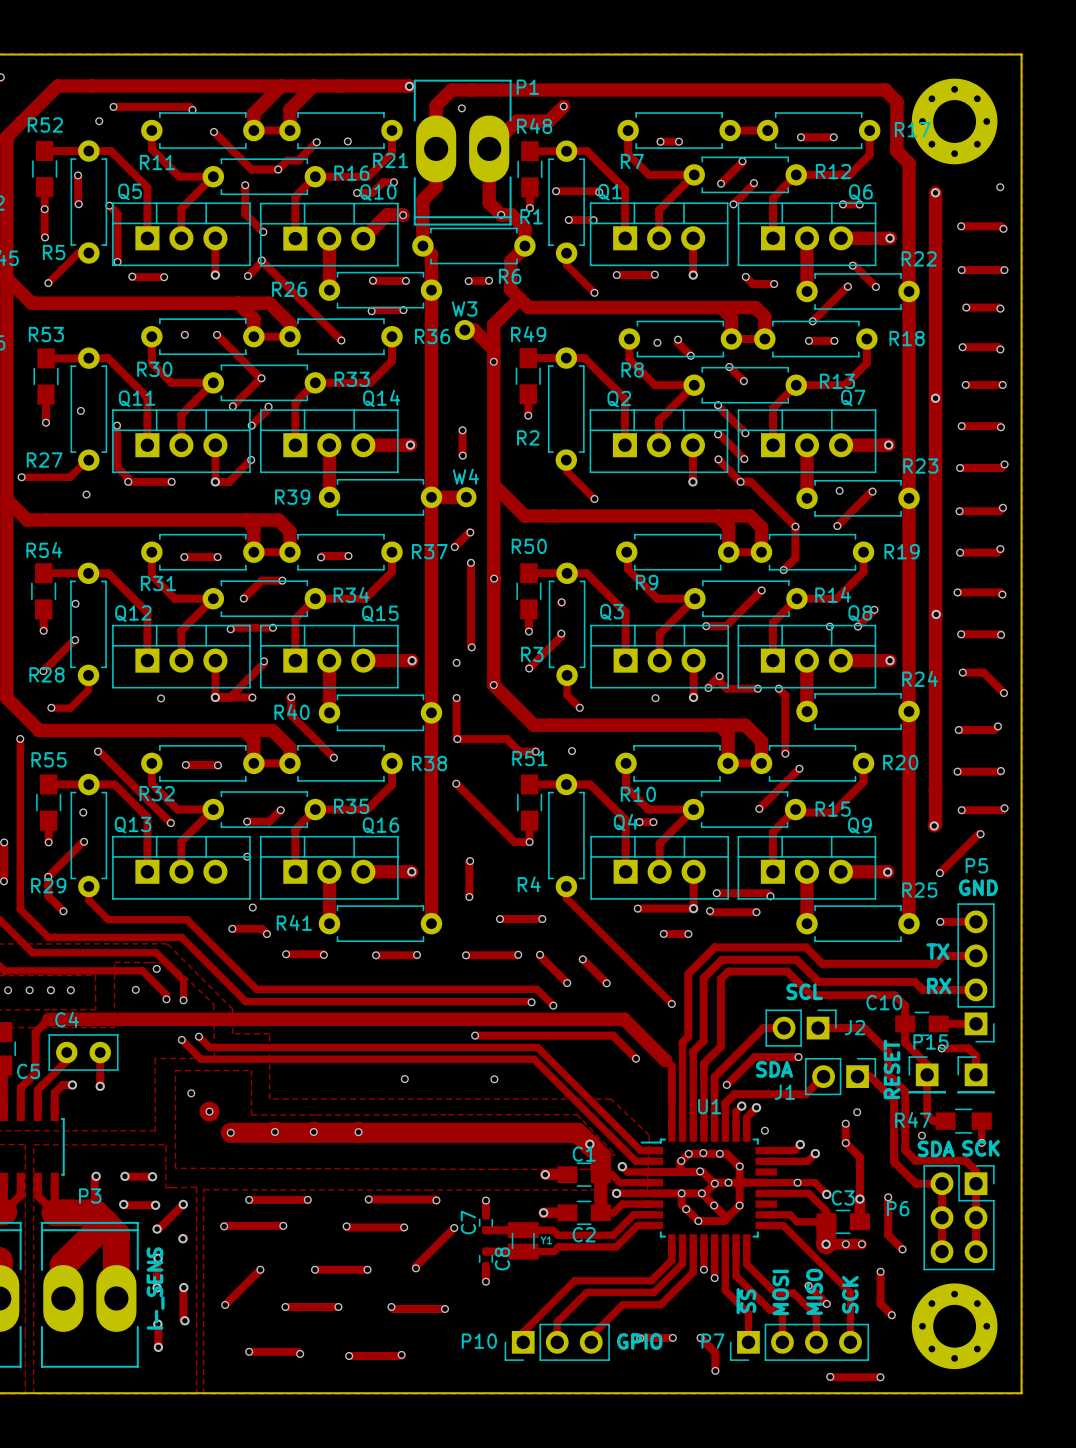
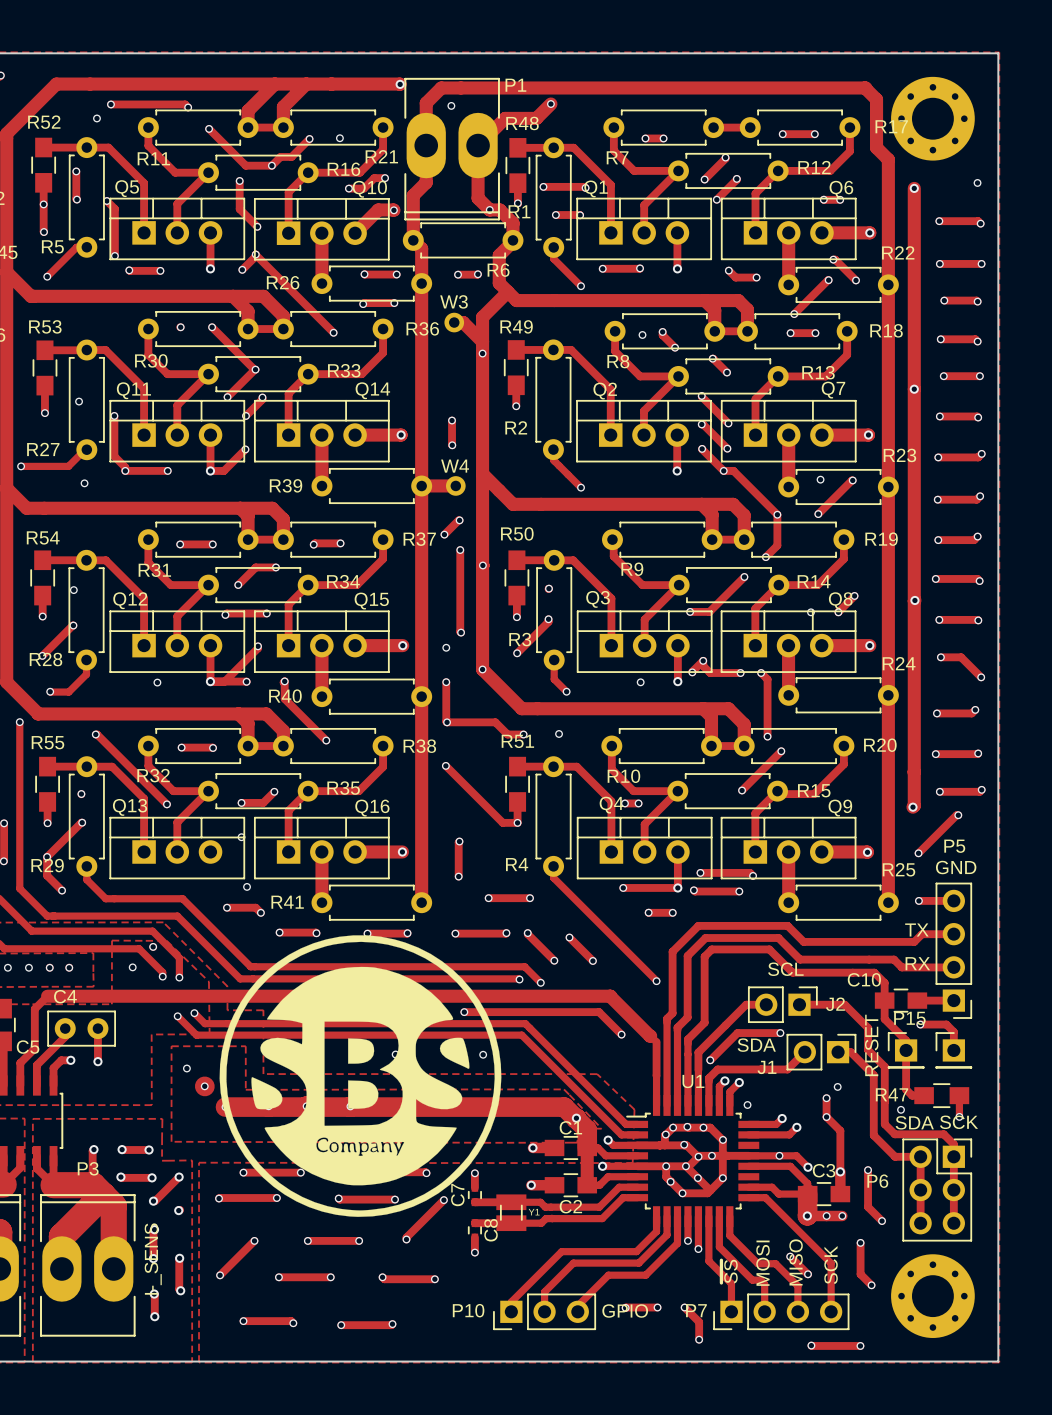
drawing: none -> [219, 935, 502, 1217]

